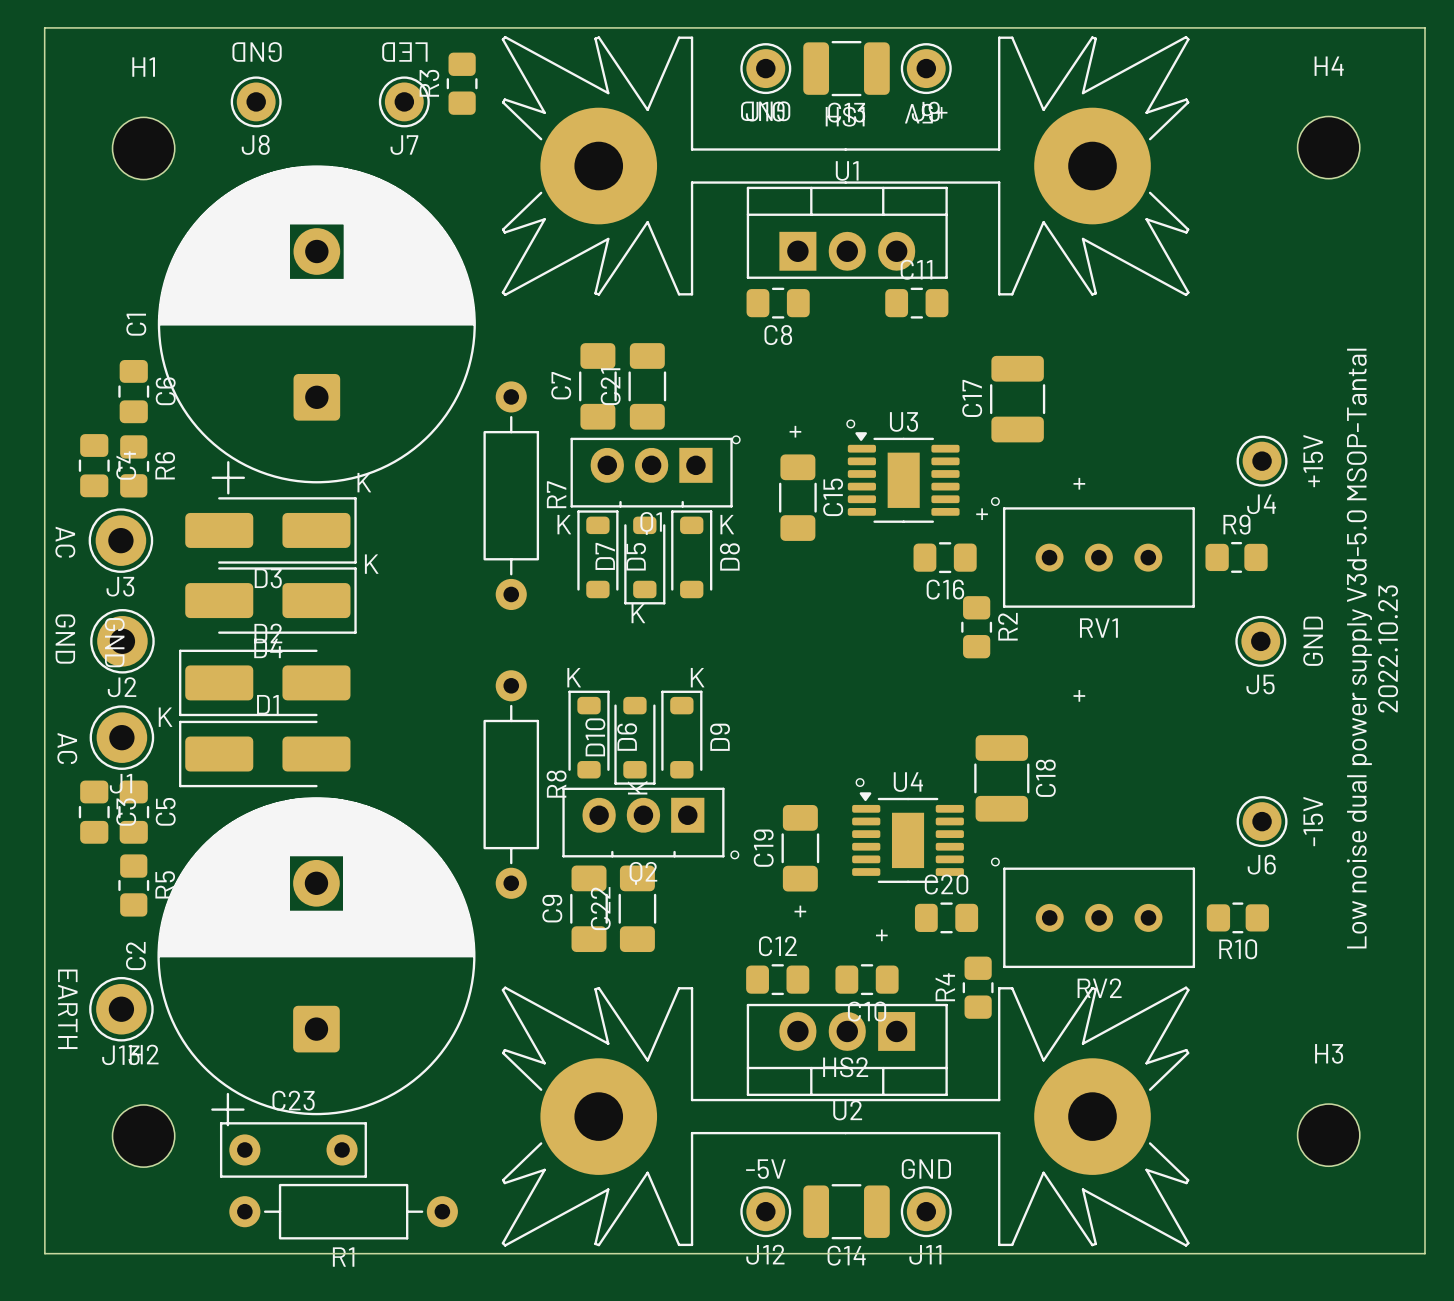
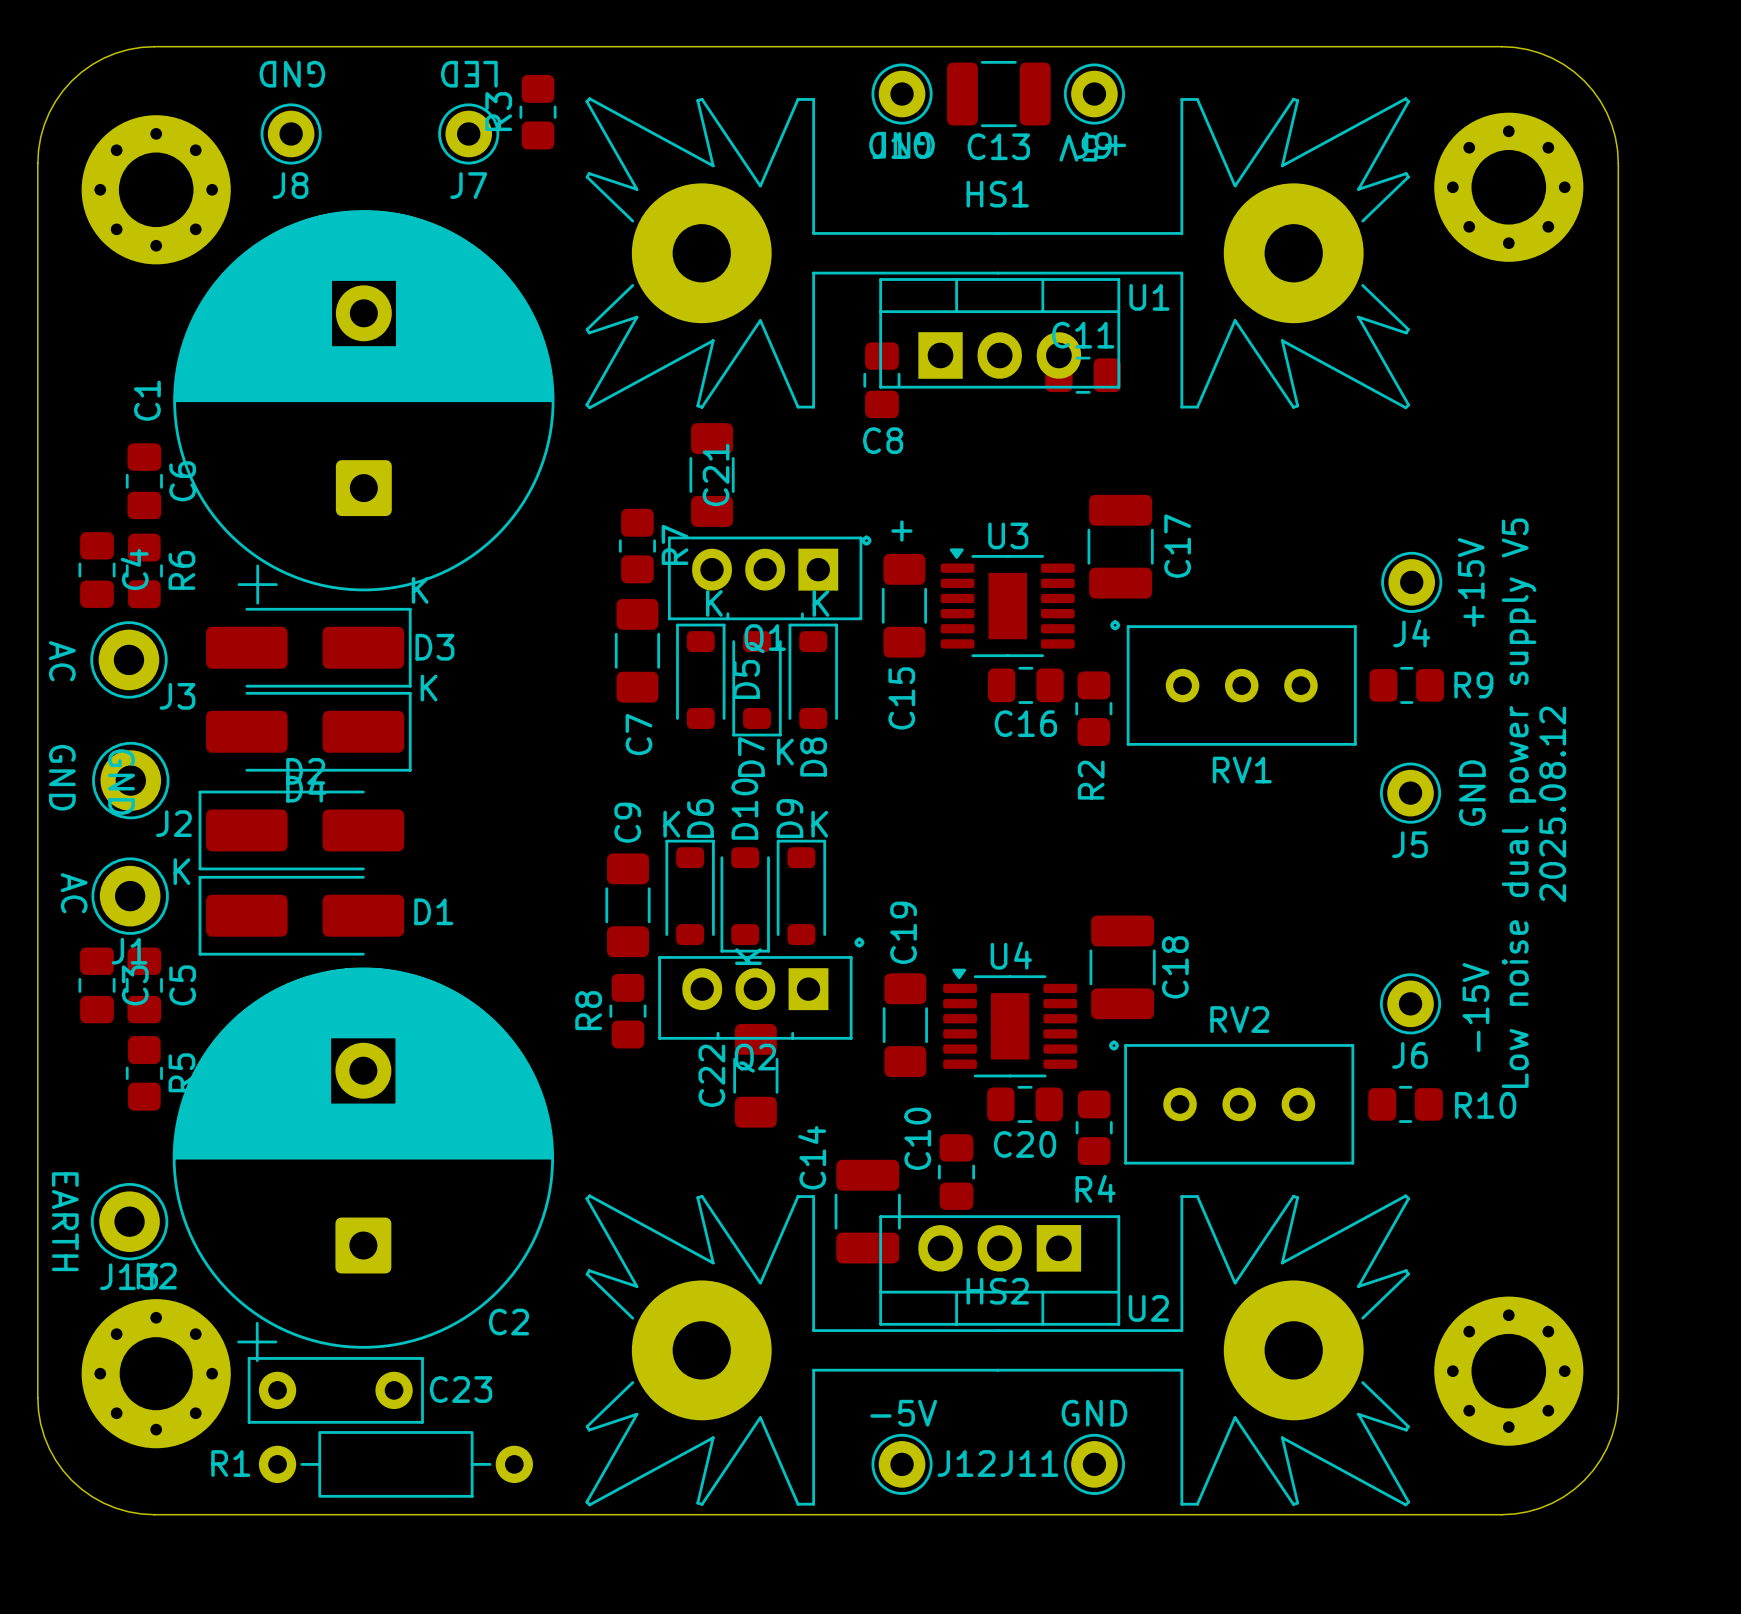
part: none -> (1508, 187)
H4: (1328, 147) -> none
H1: (143, 148) -> none
part: none -> (156, 189)
HS1 position: (845, 166) -> (997, 253)
U1 name position: U1 (847, 170) -> U1 (1149, 297)
U1 position: (847, 232) -> (999, 333)
C8 rotation: 0° (778, 303) -> 90° clockwise (881, 380)
R7 footprint: [483, 381, 540, 611] -> [618, 508, 656, 584]
C7 name position: C7 (561, 385) -> C7 (638, 734)
C7 position: (597, 386) -> (637, 650)
C21 position: (647, 386) -> (712, 474)
C17 name position: C17 (972, 398) -> C17 (1177, 546)
C17 position: (1017, 399) -> (1120, 546)
text: ° (850, 423) -> none
text position: + (795, 431) -> + (901, 531)
J4 position: (1262, 461) -> (1411, 582)
text position: +15V (1313, 461) -> +15V (1471, 582)
U3 position: (903, 477) -> (1007, 602)
text: + (1079, 483) -> none
C15 position: (797, 497) -> (904, 605)
C15 name position: C15 (833, 497) -> C15 (901, 698)
text position: ° (995, 501) -> ° (1115, 625)
text: + (982, 514) -> none
text position: K (564, 524) -> K (714, 603)
text position: K (727, 524) -> K (820, 603)
R9 name position: R9 (1236, 524) -> R9 (1473, 685)
D7 name position: D7 (605, 556) -> D7 (751, 757)
D8 name position: D8 (729, 556) -> D8 (813, 757)
C16 position: (945, 557) -> (1025, 685)
RV1 position: (1098, 557) -> (1241, 685)
R9 position: (1236, 557) -> (1406, 685)
D3 name position: D3 (268, 578) -> D3 (434, 647)
J3 name position: J3 (120, 586) -> J3 (177, 696)
text position: K (638, 613) -> K (785, 752)
R2 name position: R2 (1007, 626) -> R2 (1091, 780)
R2 position: (976, 627) -> (1093, 708)
J5 position: (1260, 641) -> (1410, 793)
text position: GND (1313, 641) -> GND (1472, 793)
text: Low noise dual power supply V3d-5.0 MSOP-Tantal (1359, 648) -> none
text: 2022.10.23 (1388, 648) -> none
text: none -> Low noise dual power supply V5 (1519, 803)
text: none -> 2025.08.12 (1552, 804)
R8 footprint: [483, 670, 540, 899] -> [609, 973, 647, 1049]
J2 name position: J2 (122, 687) -> J2 (174, 823)
text: + (1079, 695) -> none
D1 name position: D1 (267, 704) -> D1 (433, 911)
D10 name position: D10 (595, 737) -> D10 (744, 809)
D6 name position: D6 (627, 737) -> D6 (700, 818)
D9 name position: D9 (720, 737) -> D9 (789, 818)
text position: AC (67, 748) -> AC (74, 893)
text: none -> ° (859, 942)
C18 position: (1001, 778) -> (1122, 967)
text: ° (860, 782) -> none
R8 name position: R8 (556, 784) -> R8 (588, 1010)
J6 position: (1262, 821) -> (1410, 1003)
text position: -15V (1313, 821) -> -15V (1475, 1007)
U4 position: (908, 837) -> (1010, 1023)
C19 name position: C19 (763, 848) -> C19 (903, 932)
C19 position: (800, 848) -> (905, 1025)
text: ° (734, 854) -> none
text position: ° (995, 861) -> ° (1113, 1045)
C20 name position: C20 (946, 884) -> C20 (1025, 1144)
C9 name position: C9 (552, 908) -> C9 (627, 822)
C9 position: (589, 908) -> (627, 905)
C22 position: (637, 908) -> (755, 1075)
text: + (800, 911) -> none
C20 position: (946, 917) -> (1025, 1104)
RV2 position: (1099, 917) -> (1239, 1104)
R10 position: (1237, 917) -> (1405, 1104)
text: + (881, 935) -> none
R10 name position: R10 (1238, 949) -> R10 (1485, 1105)
C2 name rotation: 0° (135, 956) -> 90° clockwise (509, 1322)
C2 name position: C2 (135, 956) -> C2 (509, 1322)
C12: (777, 979) -> none
C10 rotation: 0° (867, 979) -> 90° clockwise (956, 1172)
C10 position: (867, 979) -> (956, 1172)
R4 name rotation: 0° (945, 987) -> 90° clockwise (1095, 1188)
R4 position: (978, 987) -> (1094, 1127)
RV2 name position: RV2 (1099, 988) -> RV2 (1239, 1019)
C23 name position: C23 (293, 1100) -> C23 (461, 1389)
U2 name position: U2 (847, 1110) -> U2 (1148, 1308)
part: none -> (1508, 1371)
H3: (1328, 1135) -> none
part: none -> (156, 1373)
C14 rotation: 0° (846, 1211) -> 90° clockwise (867, 1211)
C14 position: (846, 1211) -> (867, 1211)
board edge: (142, 1253) (44, 1253) (44, 27) (1425, 27) (1425, 1253) (1266, 1253) -> (154, 1514) (115, 1508) (92, 1496) (71, 1480) (49, 1448) (40, 1424) (37, 1398) (38, 150) (44, 124) (55, 101) (81, 72) (115, 53) (154, 46) (1501, 46) (1540, 53) (1563, 64) (1584, 80) (1606, 112) (1615, 137) (1618, 163) (1617, 1411) (1606, 1448) (1584, 1480) (1552, 1503) (1527, 1511) (1501, 1514)
J12 name position: J12 (765, 1254) -> J12 (966, 1463)
J11 name position: J11 (925, 1254) -> J11 (1029, 1463)
C14 name position: C14 (846, 1255) -> C14 (812, 1157)
R1 name position: R1 (343, 1257) -> R1 (230, 1463)

